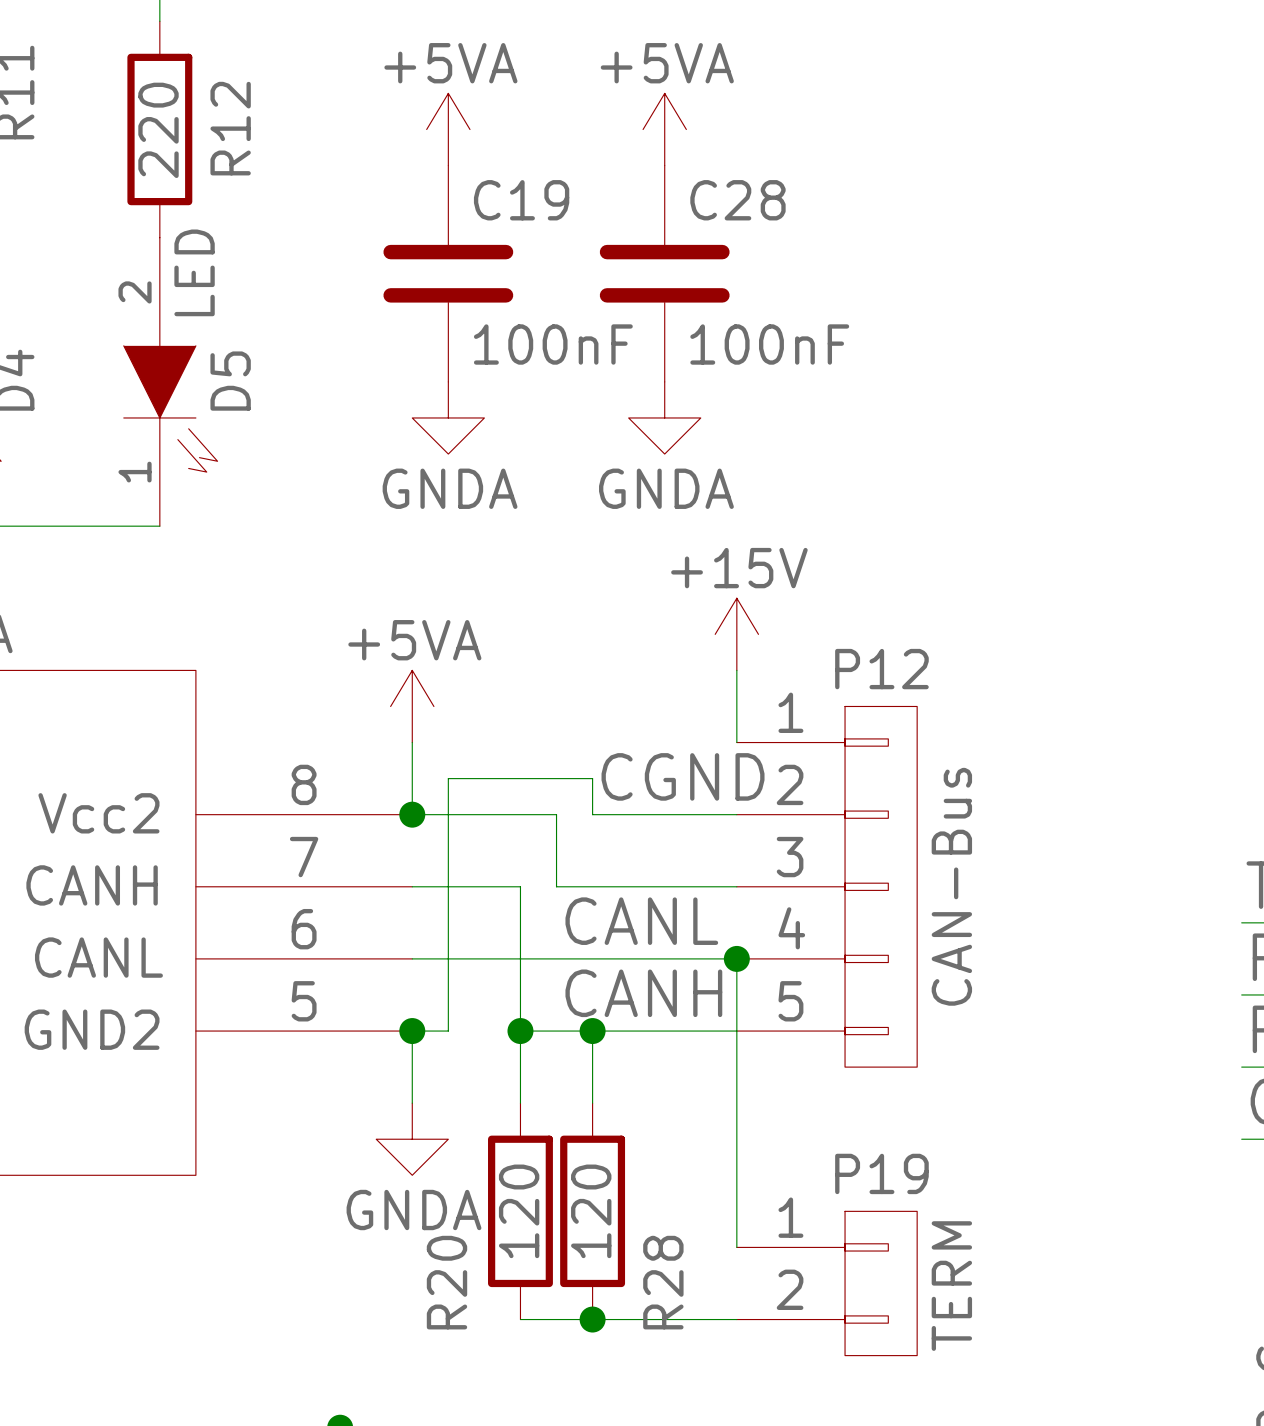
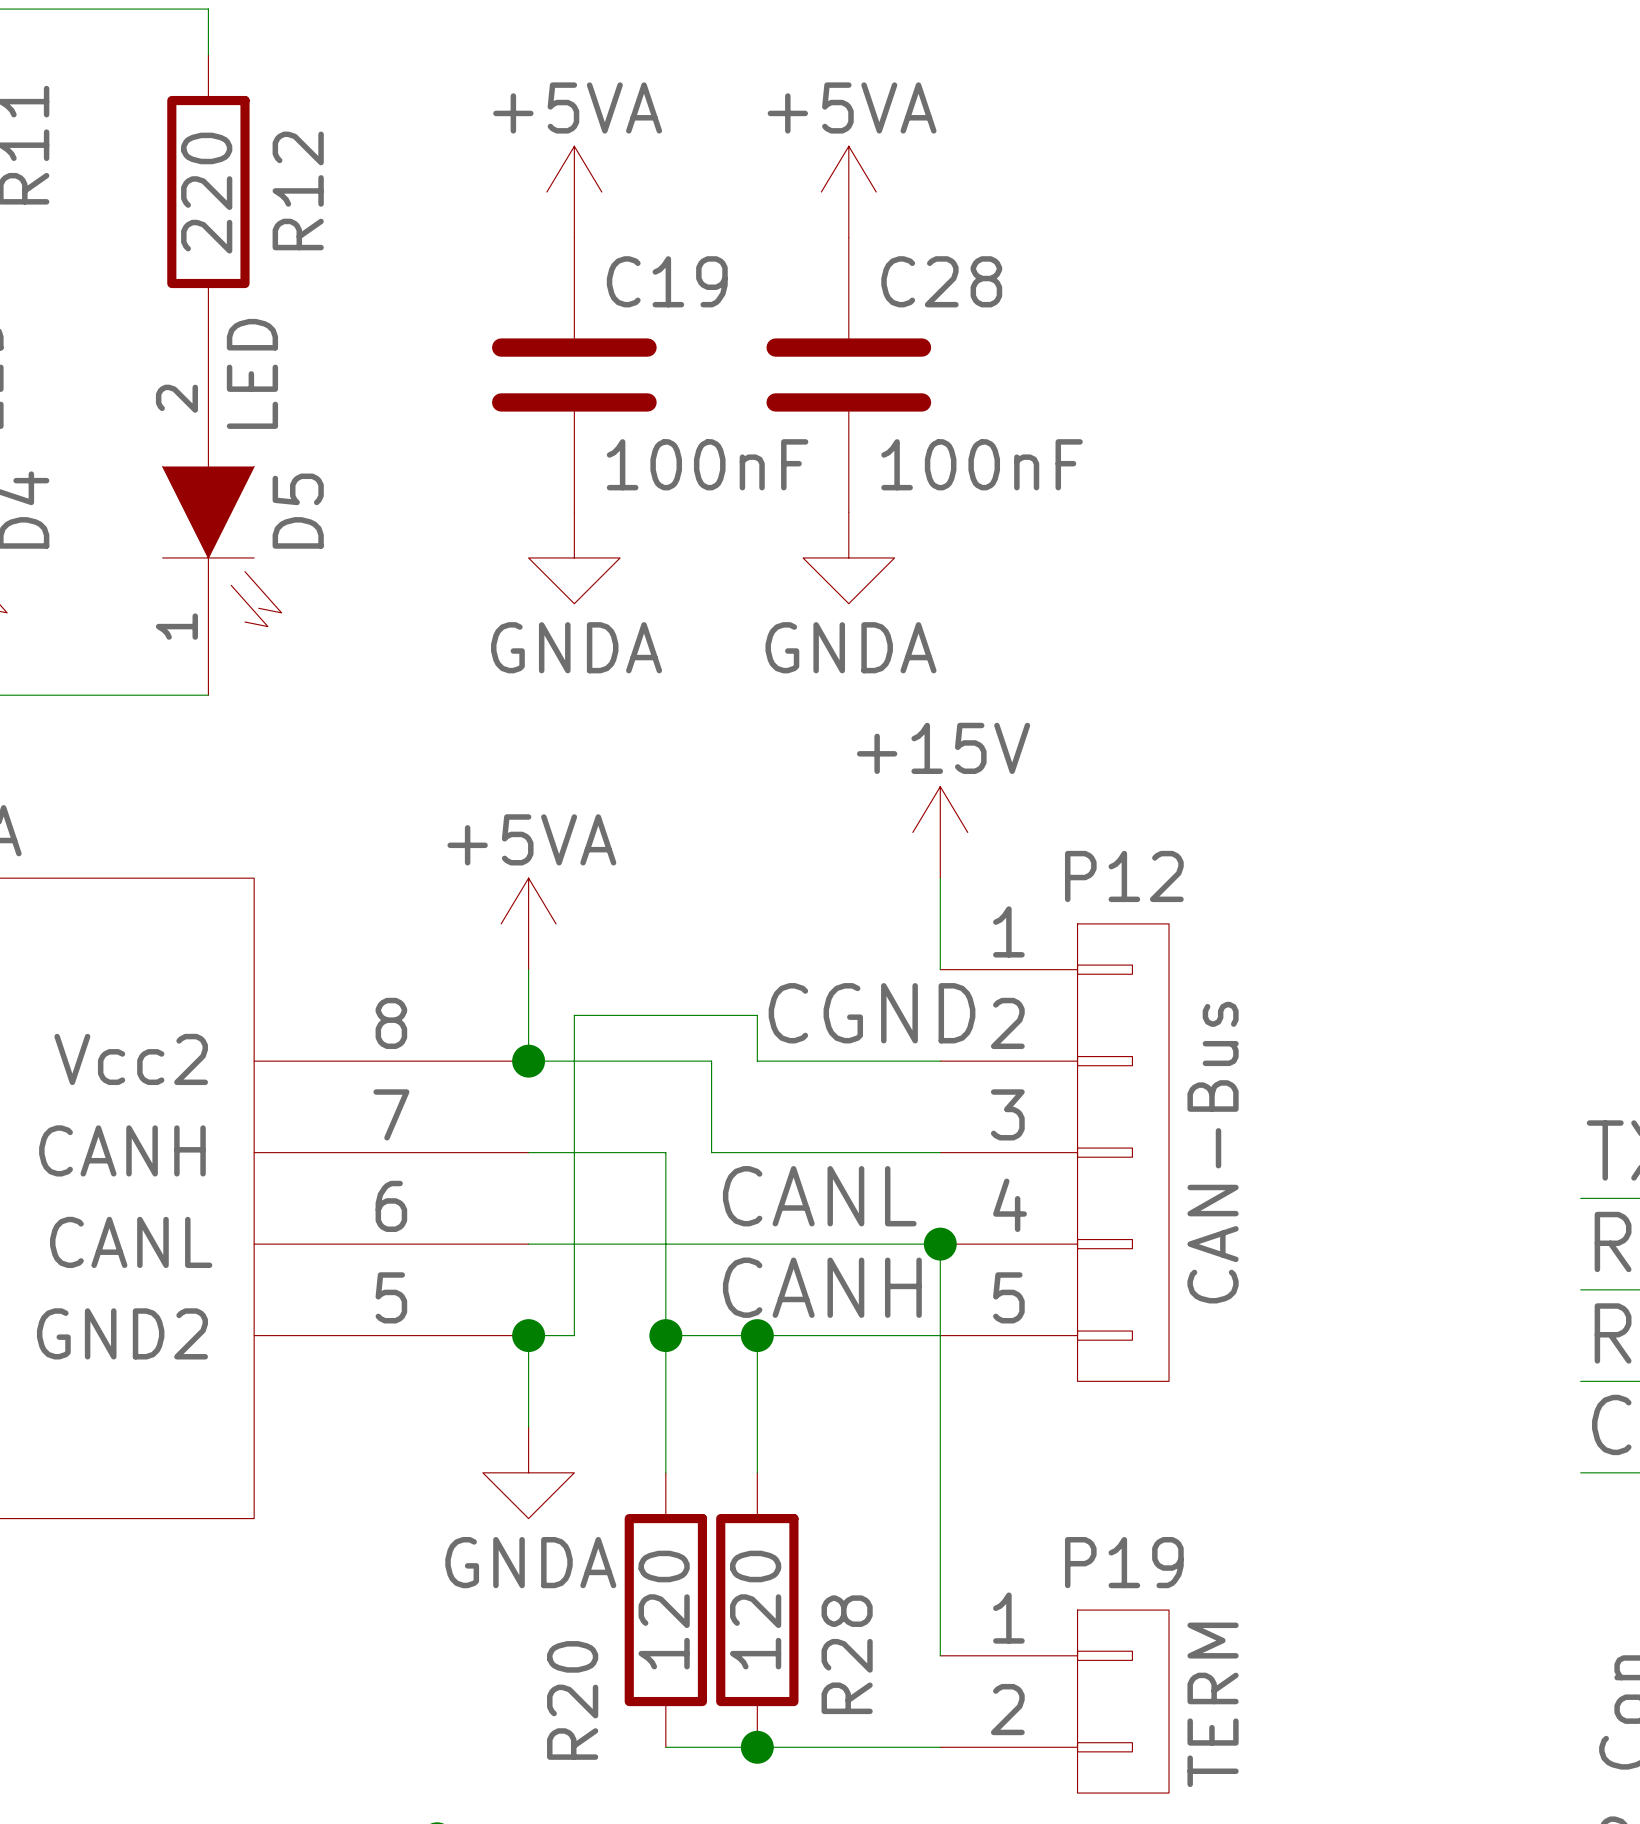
R20 position: (520, 1211) -> (665, 1610)
R28 position: (592, 1211) -> (757, 1610)
wire: none -> (940, 1610) (940, 1655)
P19 position: (827, 1283) -> (1054, 1701)
wire: (520, 1319) (736, 1319) -> (665, 1747) (940, 1747)
junction position: (592, 1319) -> (757, 1747)

